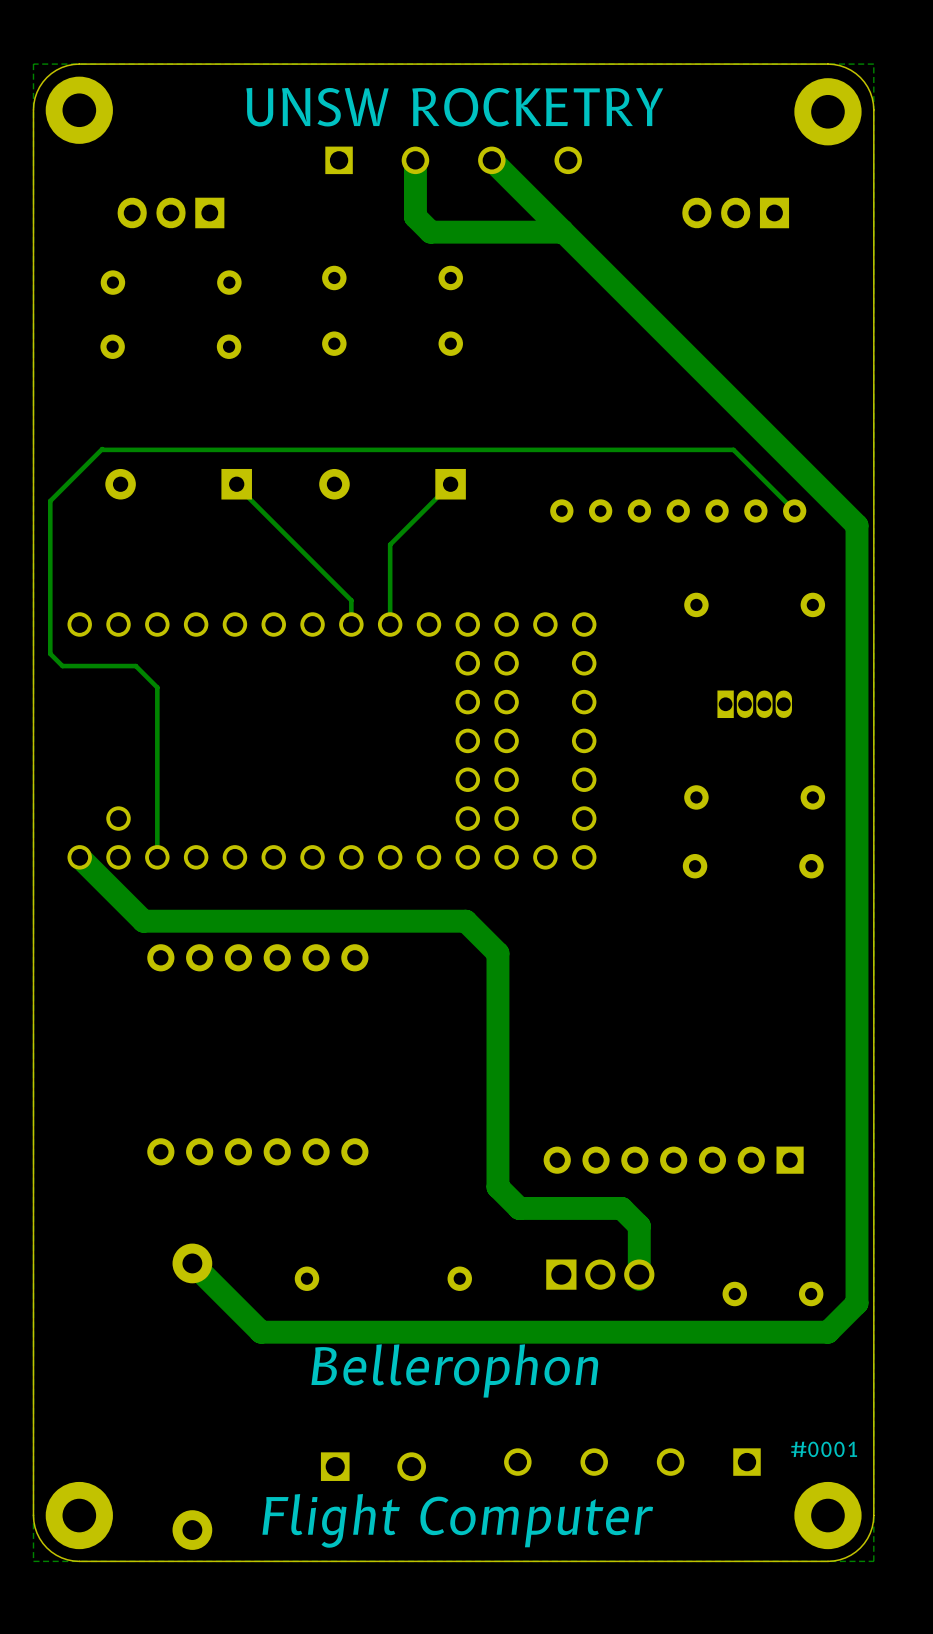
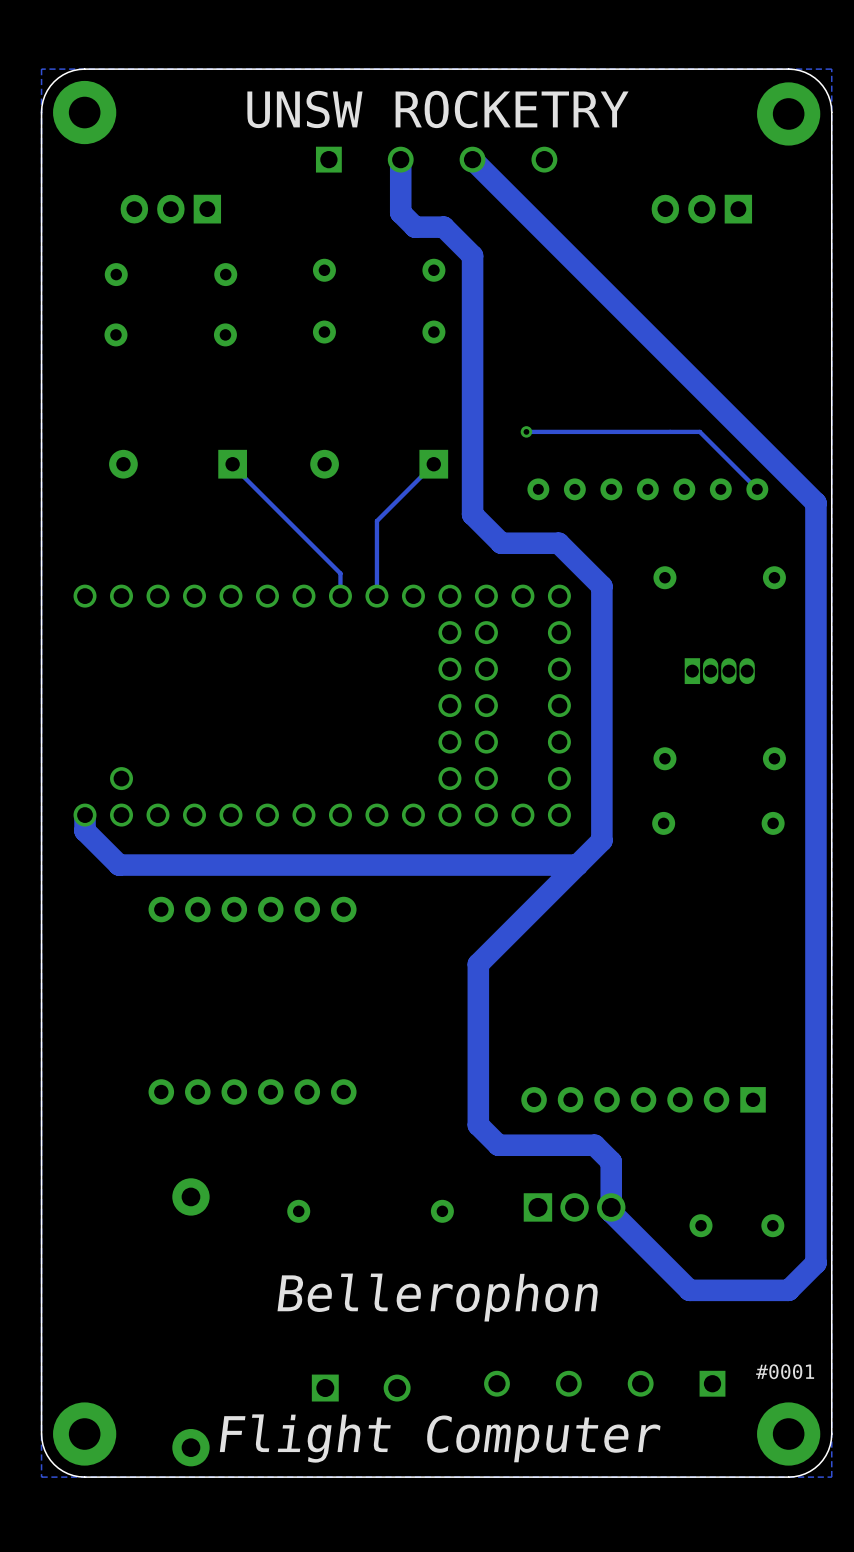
track: (562, 230) (560, 232) (461, 232) -> (478, 964) (601, 840) (601, 586) (558, 543) (501, 543) (472, 514) (472, 255) (443, 227)
track: (549, 449) (102, 449) (50, 501) (50, 653) (62, 666) (135, 666) (157, 687) (157, 857) -> none
via: none -> (526, 431)
track: (79, 857) (143, 921) (465, 921) (497, 953) (497, 1015) -> (85, 815) (85, 830) (119, 865) (577, 865)
track: (192, 1263) (261, 1332) (827, 1332) (857, 1303) -> (611, 1212) (689, 1290) (788, 1290) (815, 1263) (815, 1234)

